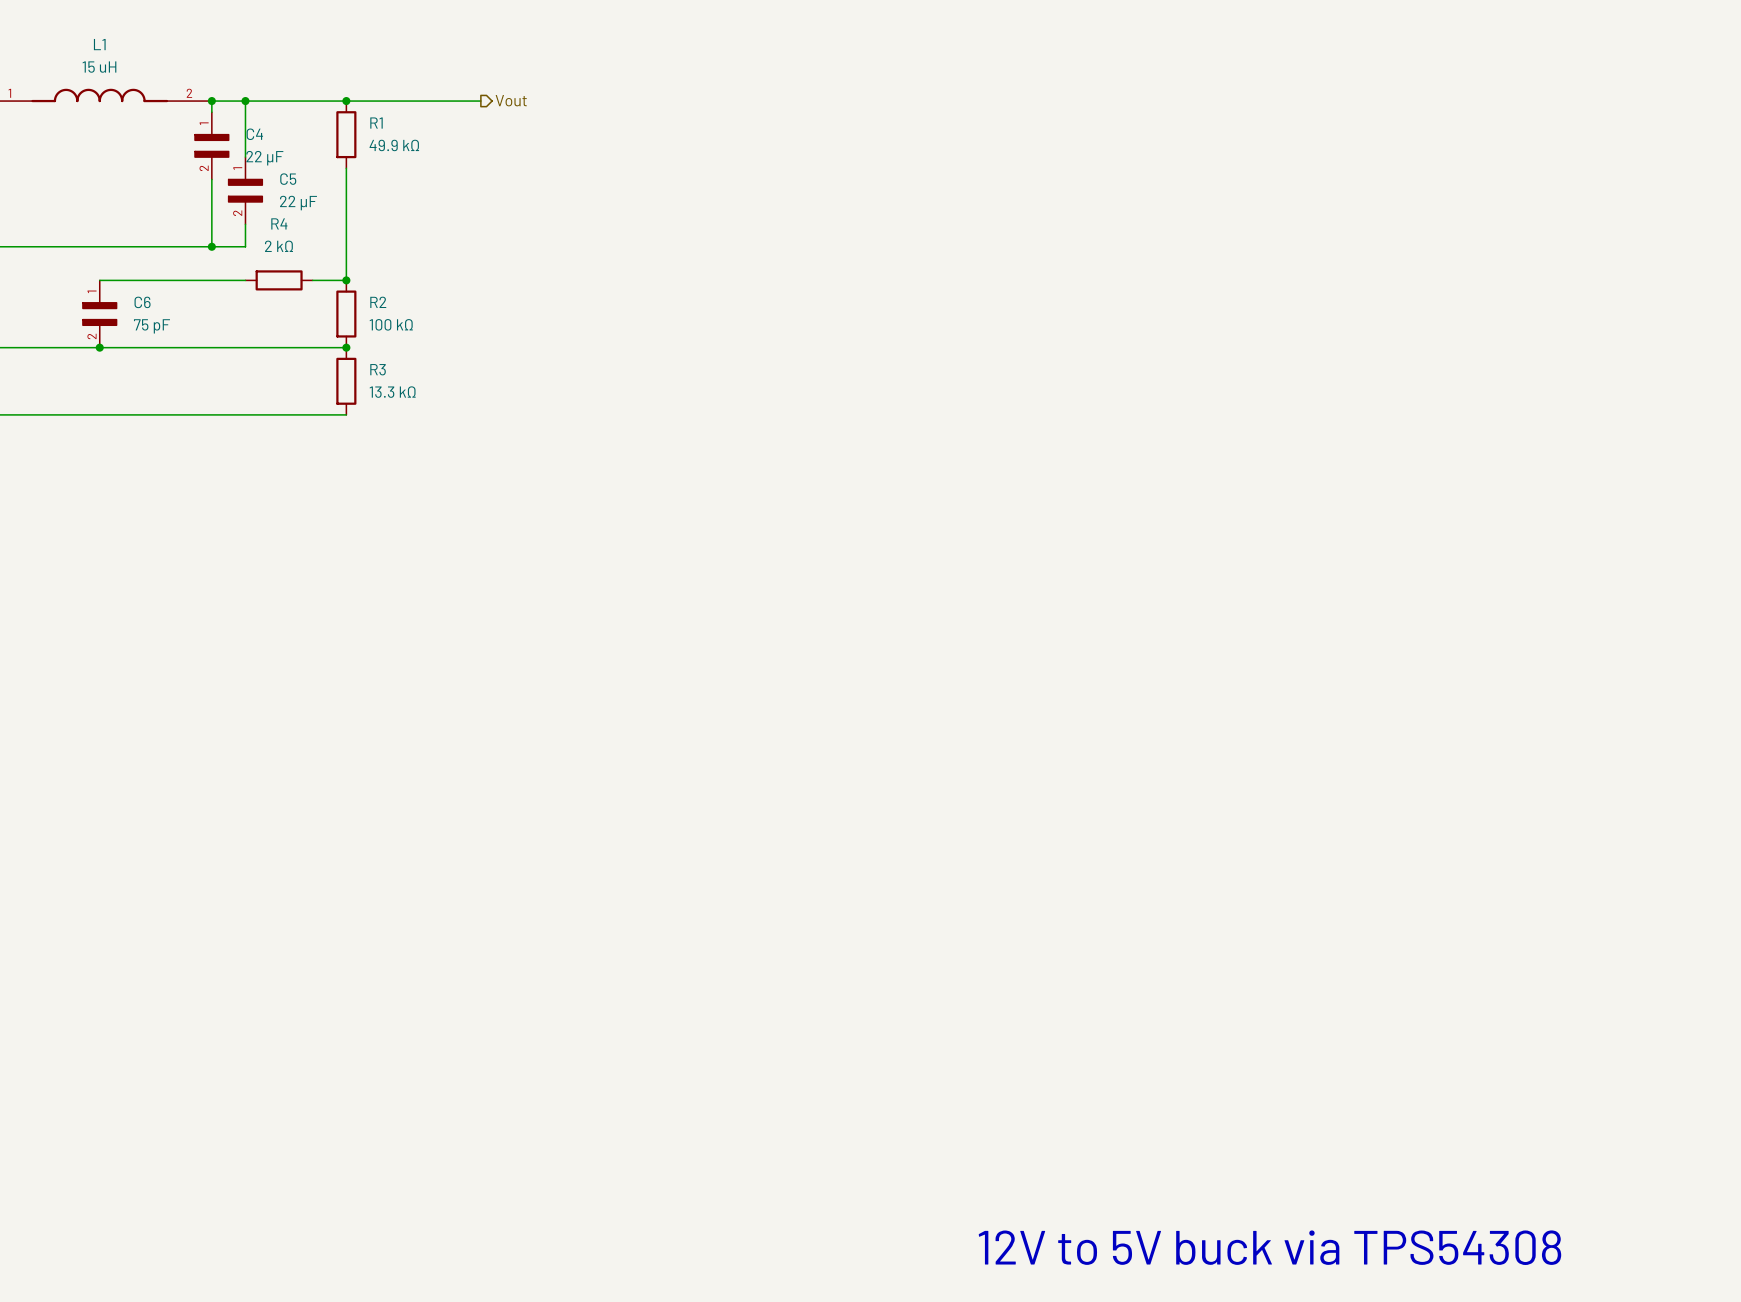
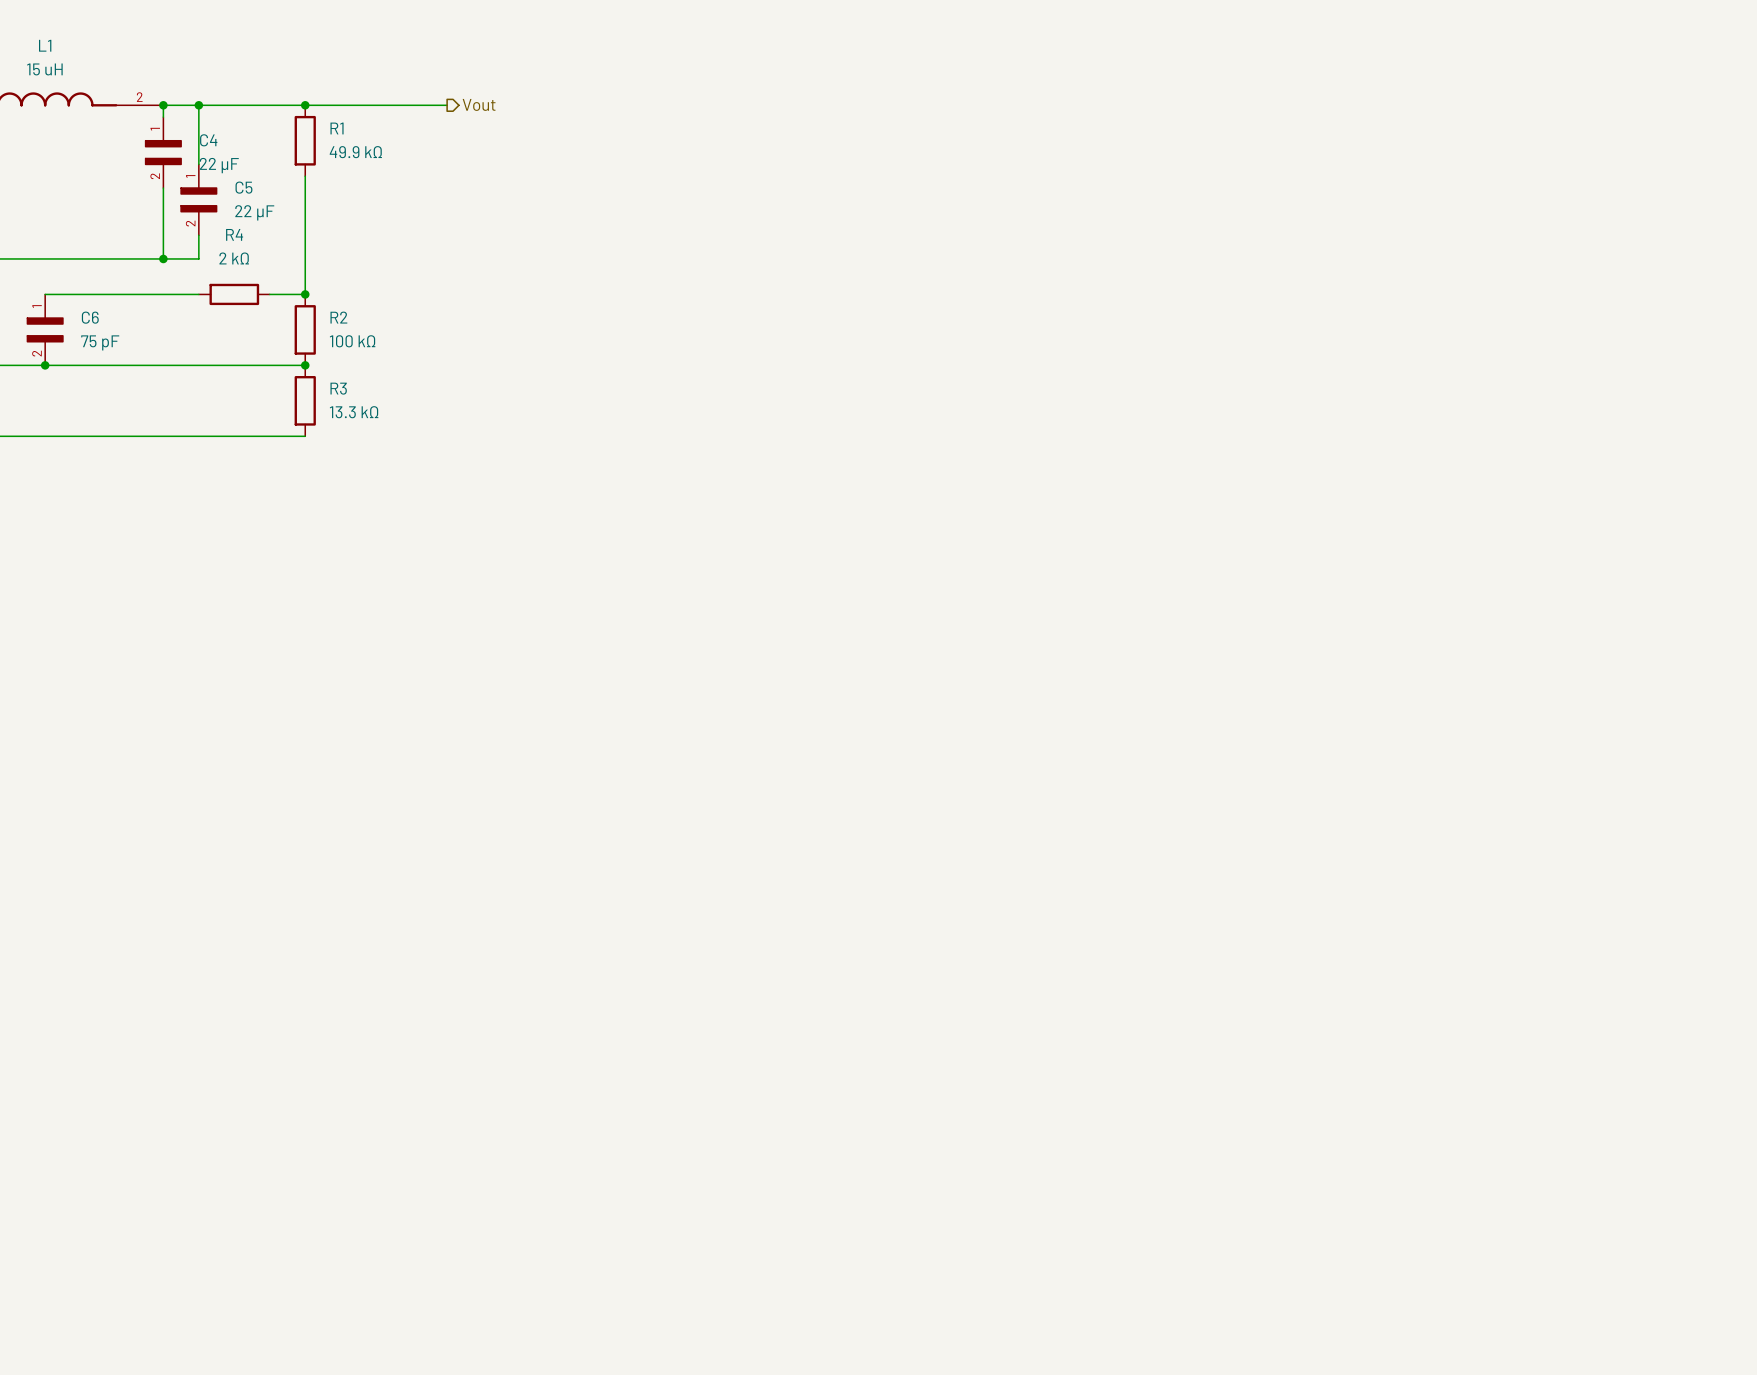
text: 12V to 5V buck via TPS54308 (1269, 1247) -> none

